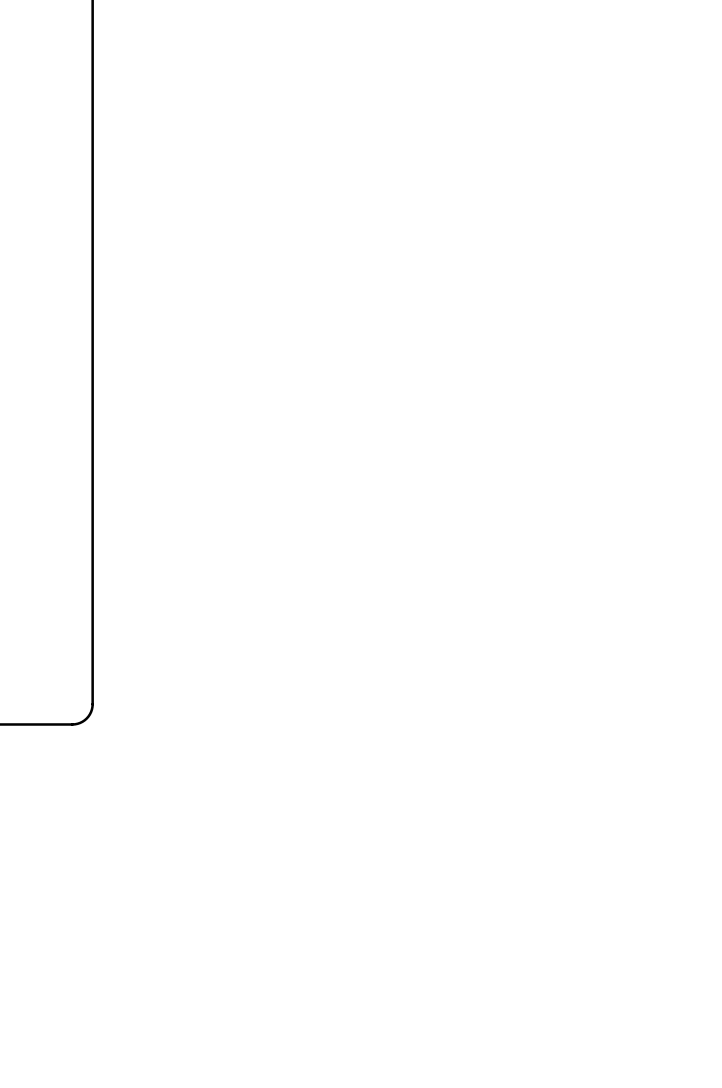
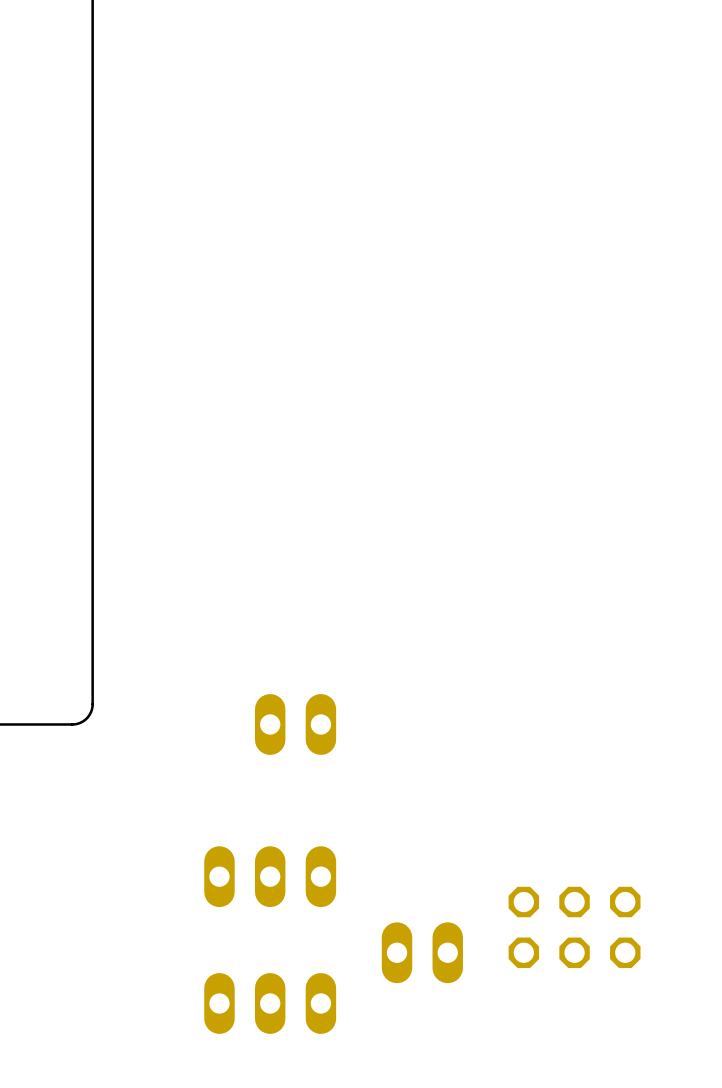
part: none -> (295, 724)
part: none -> (270, 876)
part: none -> (574, 927)
part: none -> (422, 952)
part: none -> (270, 1003)

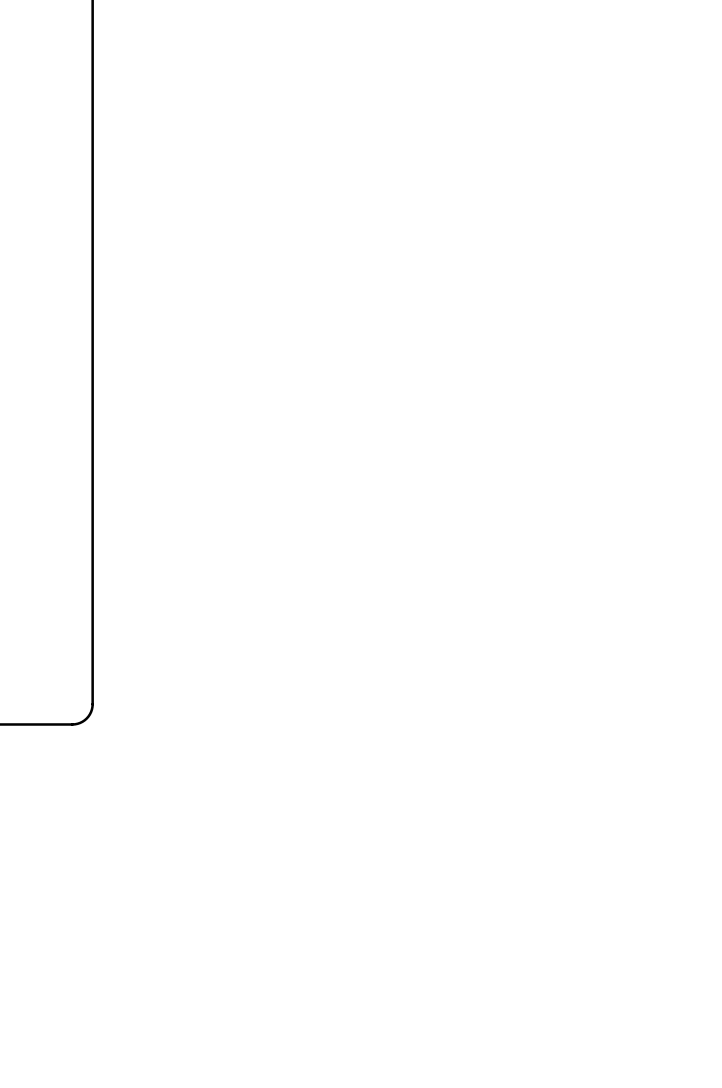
part: (295, 724) -> none
part: (270, 876) -> none
part: (574, 927) -> none
part: (422, 952) -> none
part: (270, 1003) -> none

